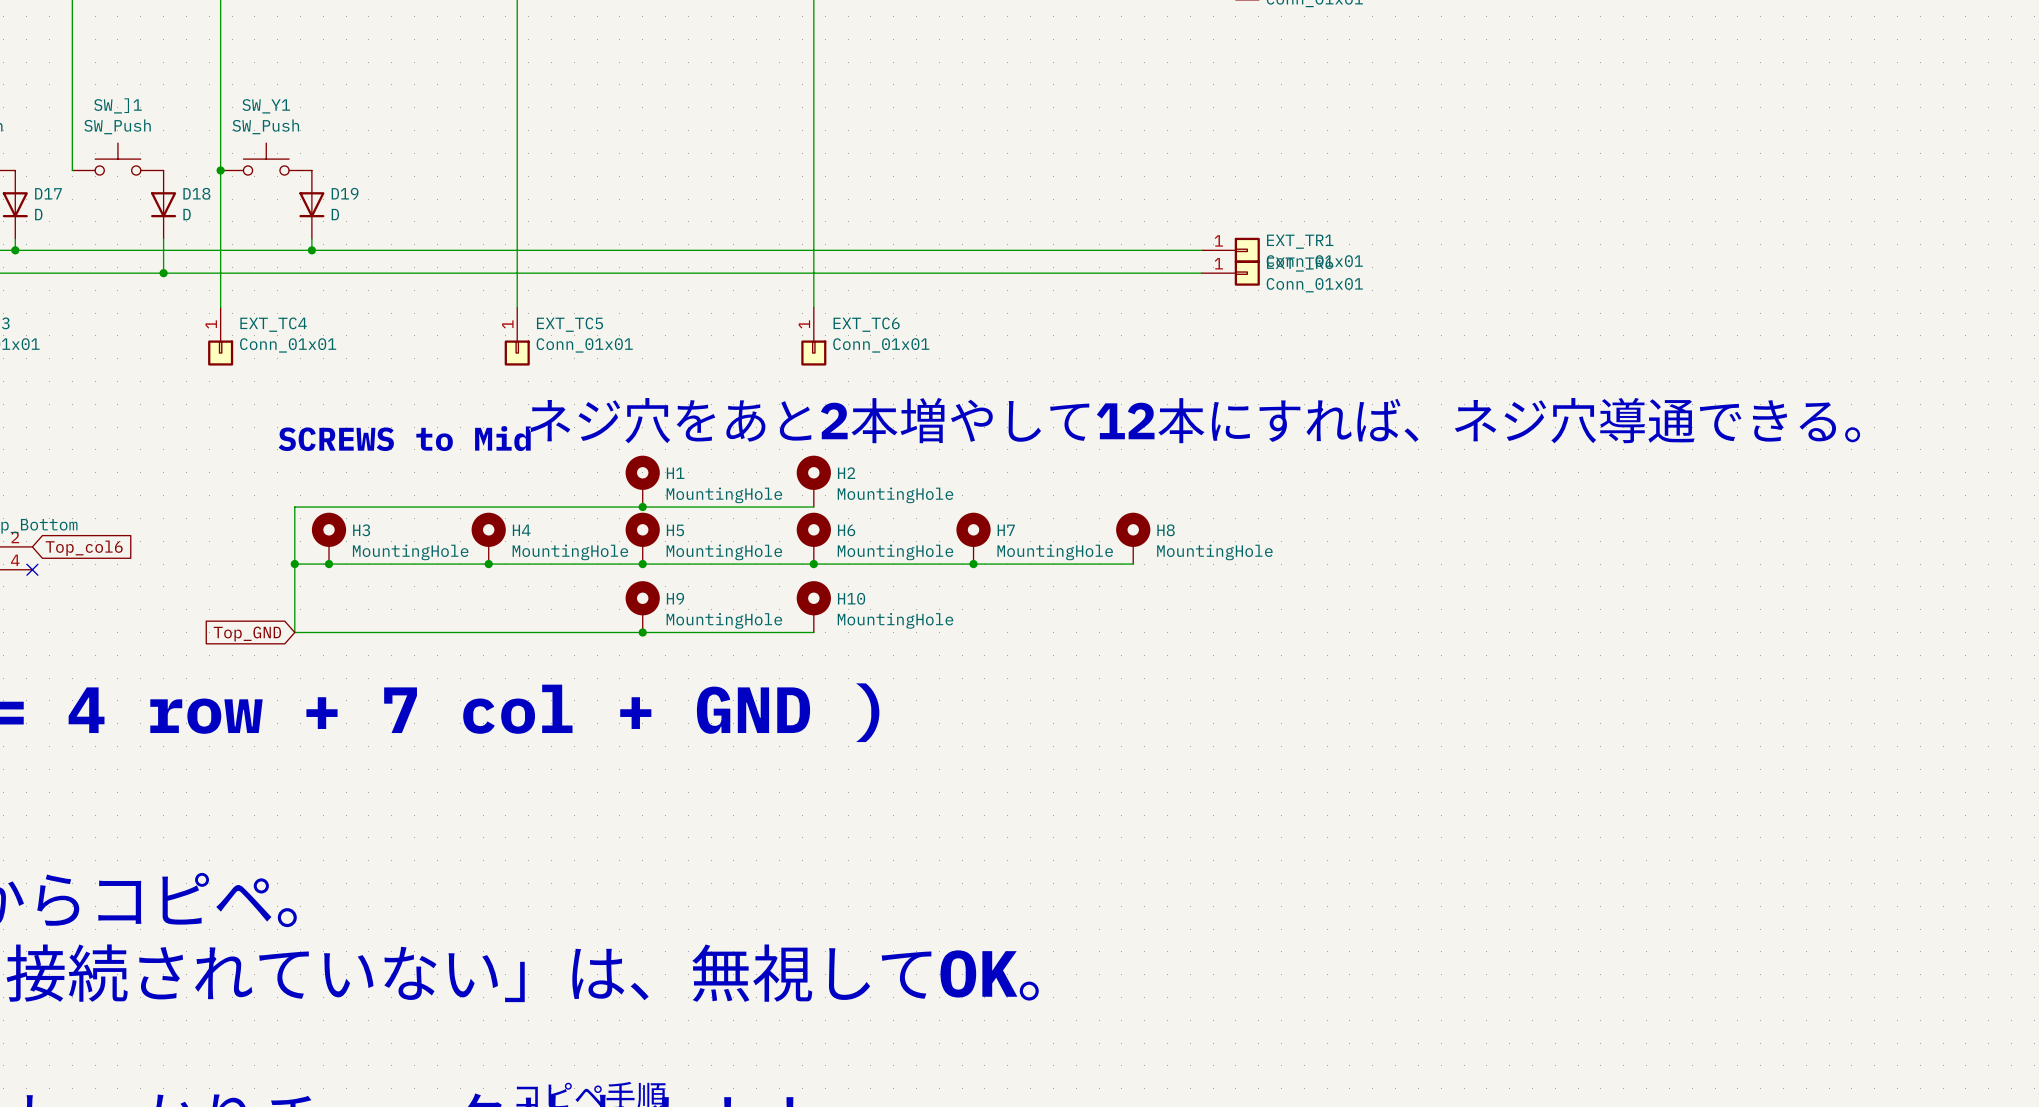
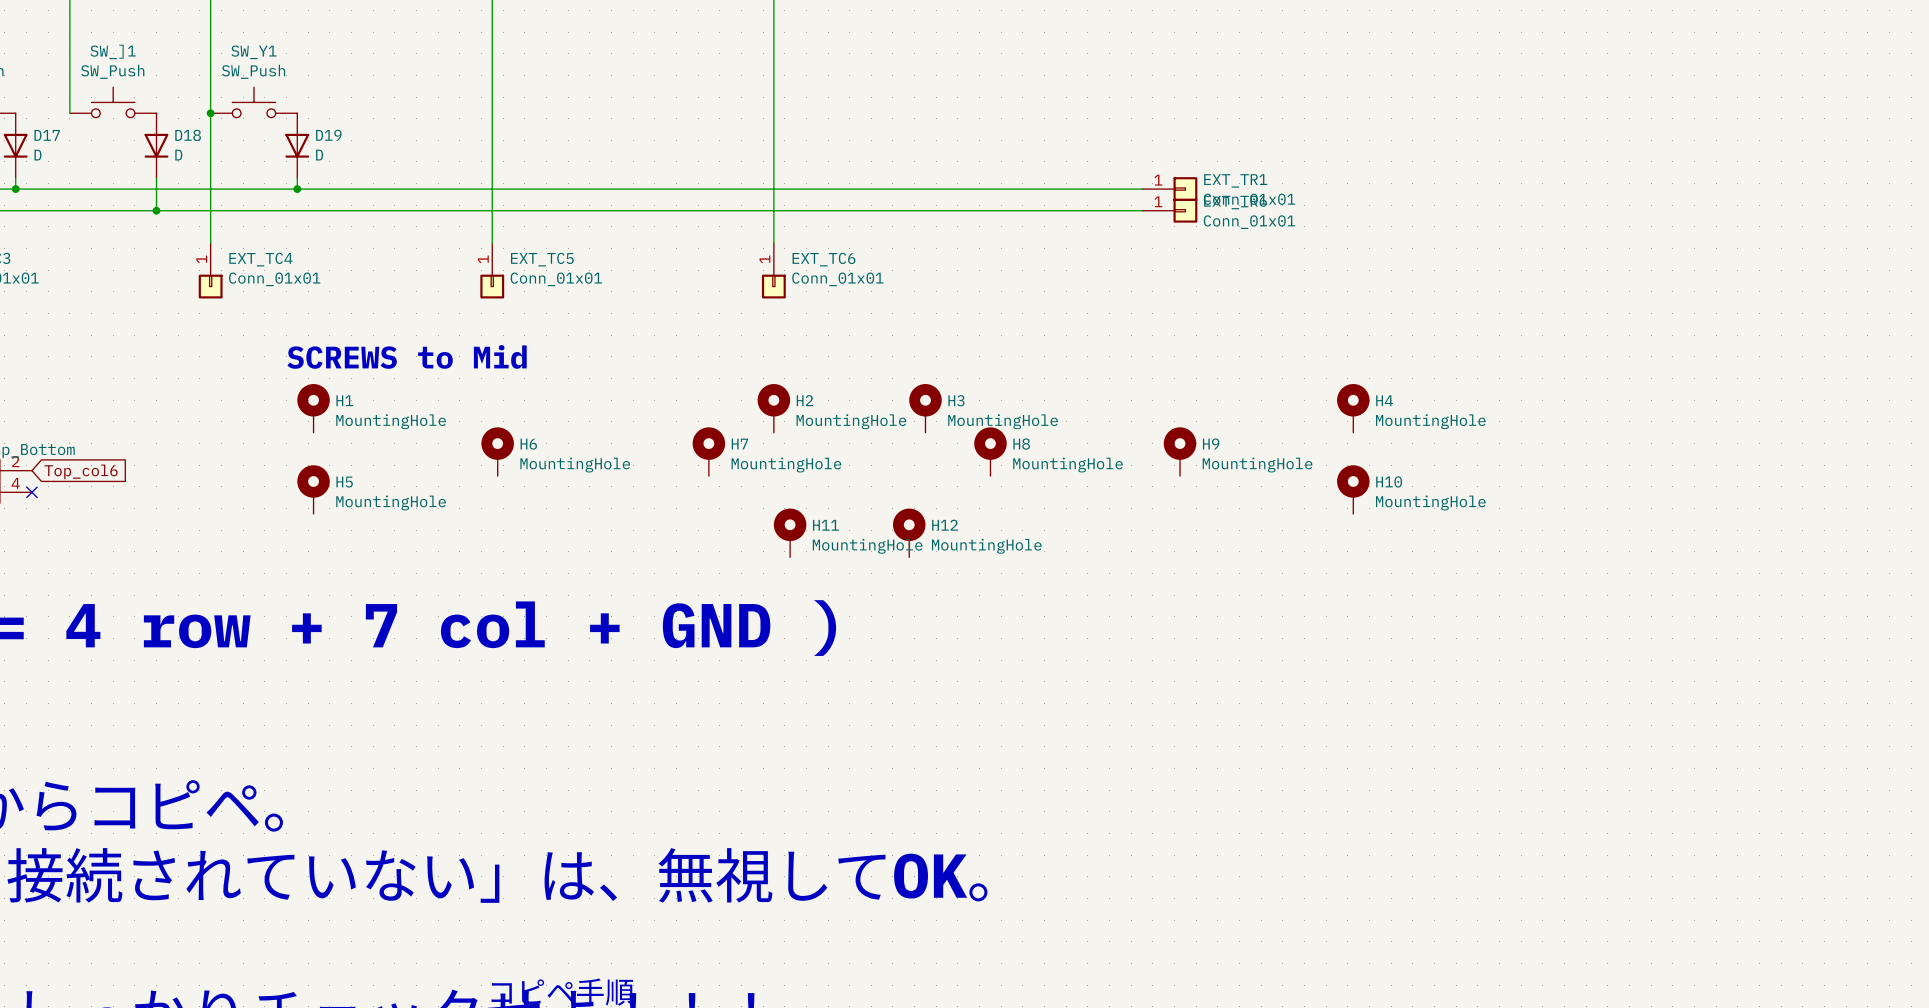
text: ネジ穴をあと2本増やして12本にすれば、ネジ穴導通できる。 (1194, 420) -> none
text position: SCREWS to Mid (404, 438) -> SCREWS to Mid (407, 356)
H1 position: (642, 481) -> (313, 408)
junction: (642, 507) -> none
wire: (813, 507) (294, 507) (294, 632) (813, 632) -> none
H3 position: (329, 538) -> (925, 408)
H4 position: (488, 538) -> (1353, 408)
H5 position: (642, 538) -> (313, 489)
H6 position: (813, 538) -> (497, 451)
H7 position: (973, 538) -> (708, 451)
H8 position: (1133, 538) -> (990, 451)
wire: (294, 564) (1133, 564) -> none
junction: (294, 564) -> none
junction: (329, 564) -> none
junction: (488, 564) -> none
junction: (642, 564) -> none
junction: (813, 564) -> none
junction: (973, 564) -> none
H9 position: (642, 606) -> (1180, 451)
H10 position: (813, 606) -> (1353, 489)
H11: none -> MountingHole (790, 532)
H12: none -> MountingHole (909, 532)
junction: (642, 632) -> none
global label: Top_GND (247, 634) -> none

